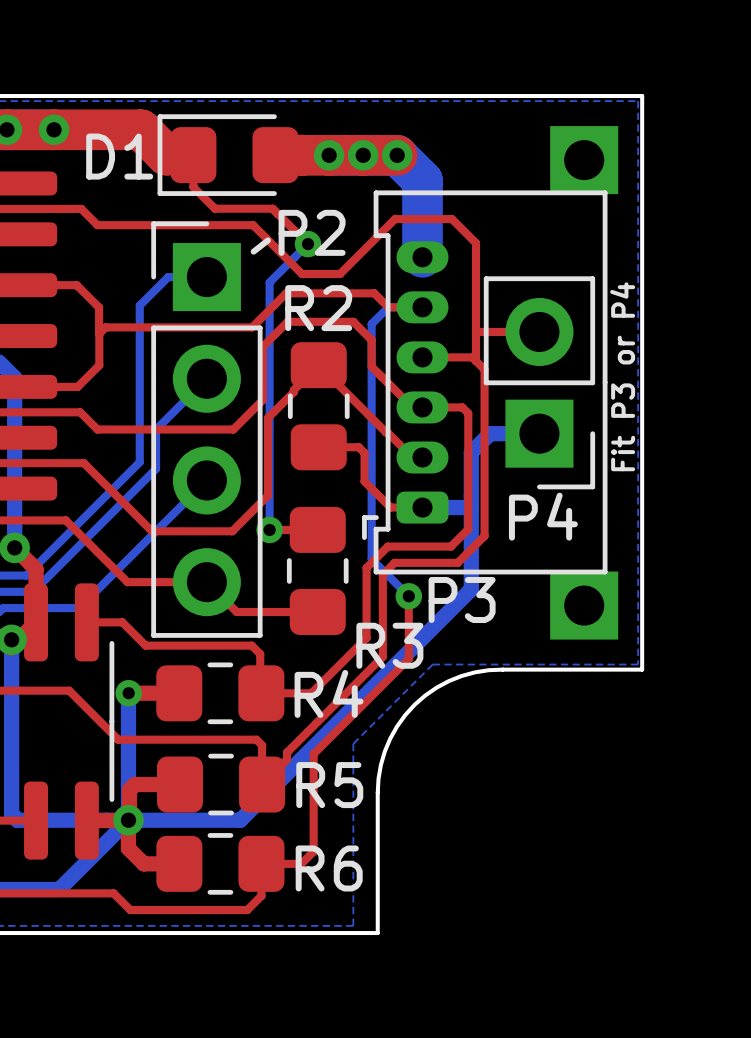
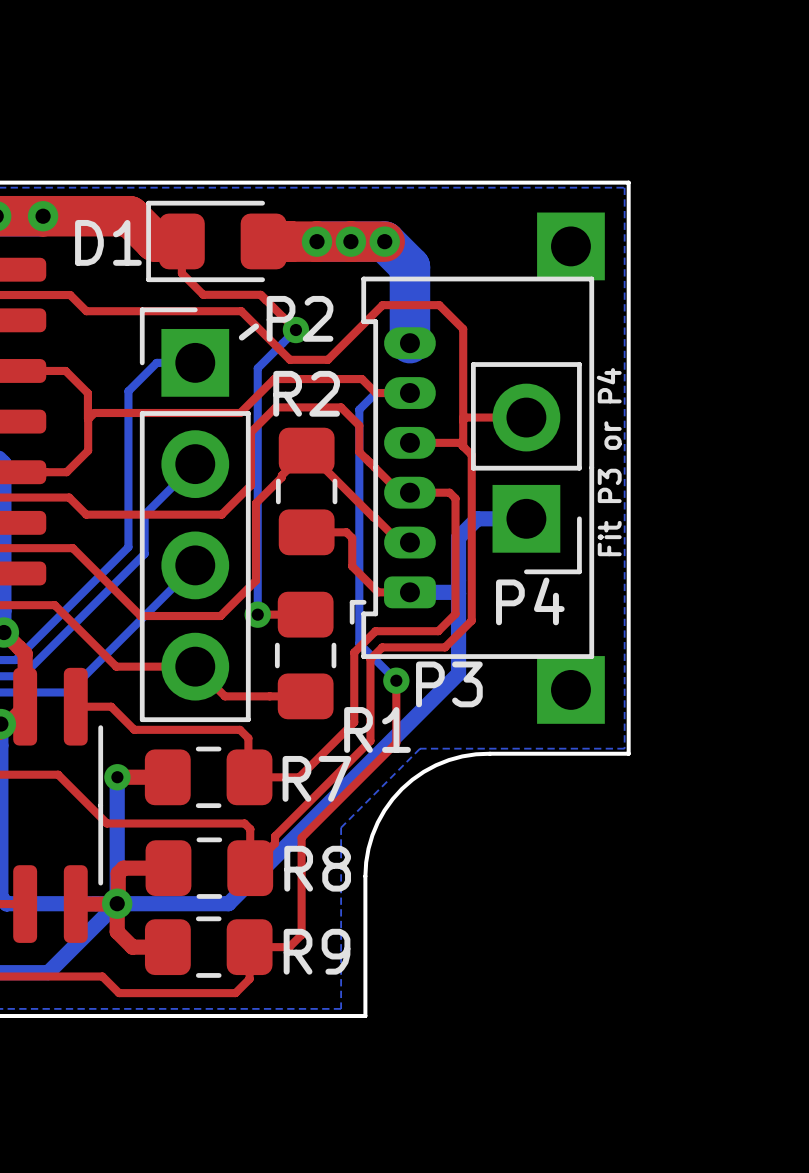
R3 name: R3 (389, 645) -> R1 (377, 729)
R4 name: R4 (329, 693) -> R7 (316, 778)
R5 name: R5 (329, 785) -> R8 (317, 868)
R6 name: R6 (329, 868) -> R9 (317, 951)

